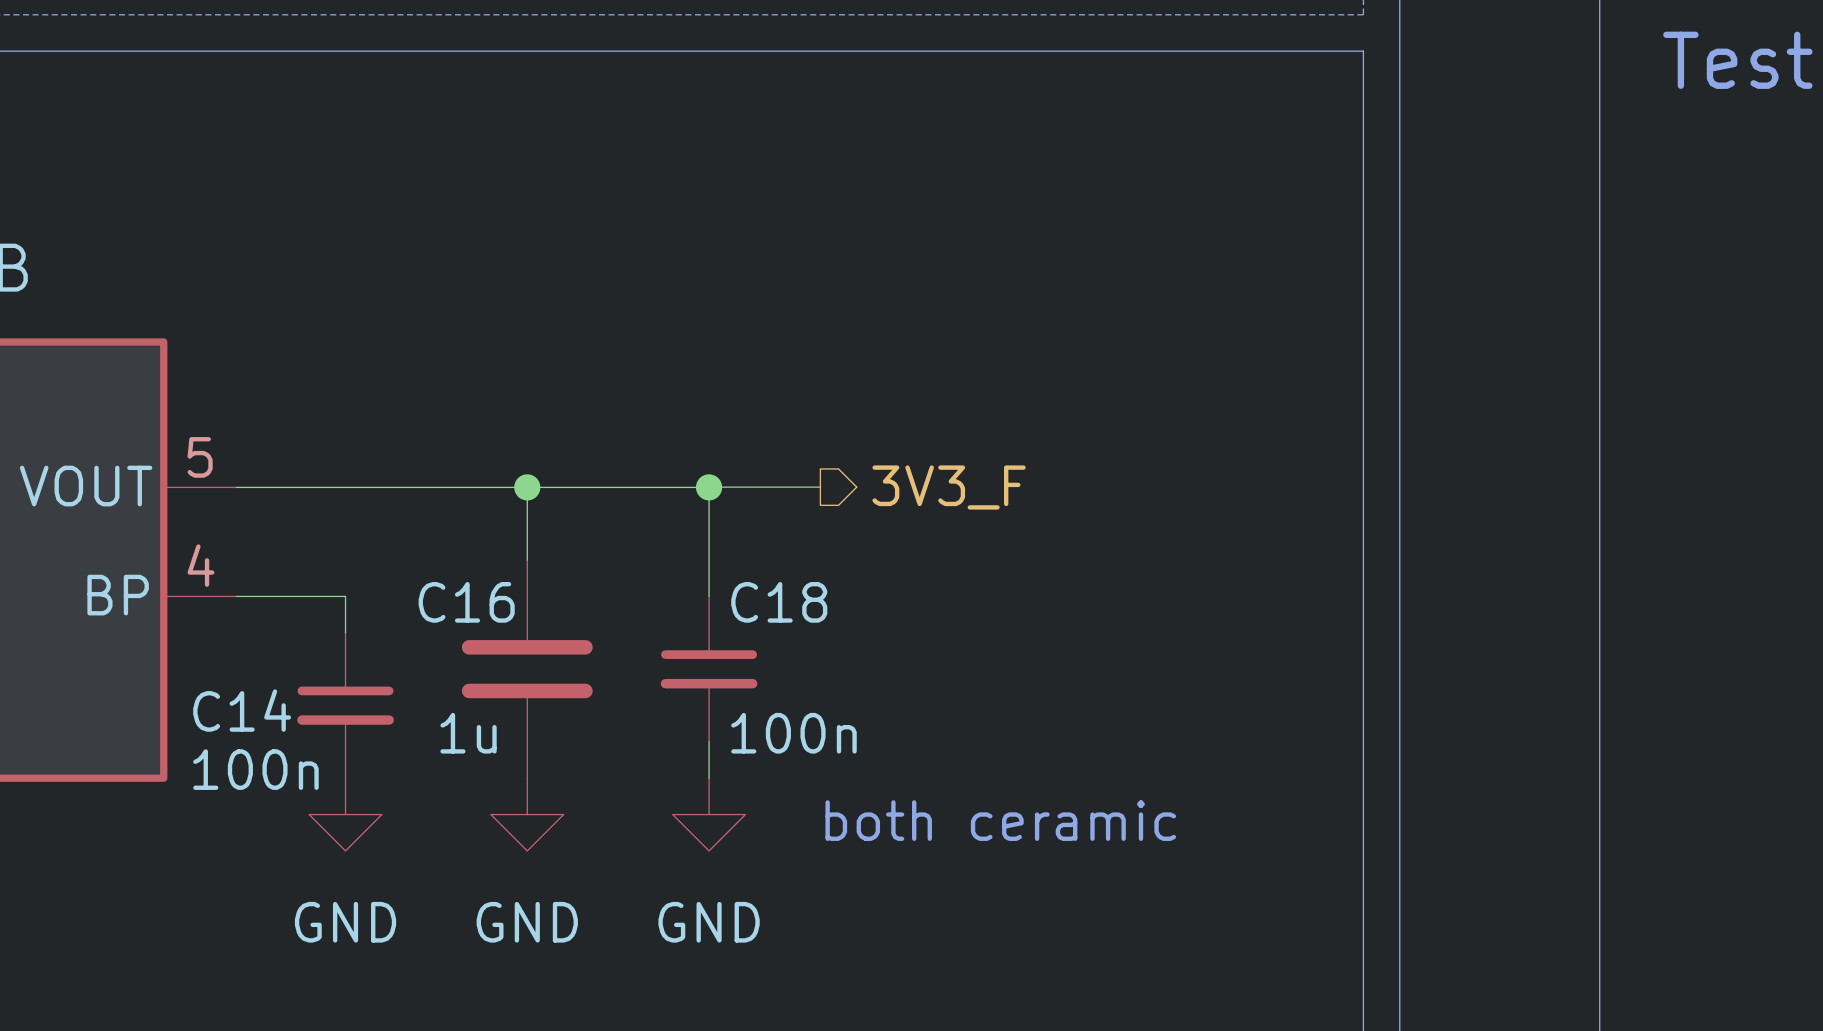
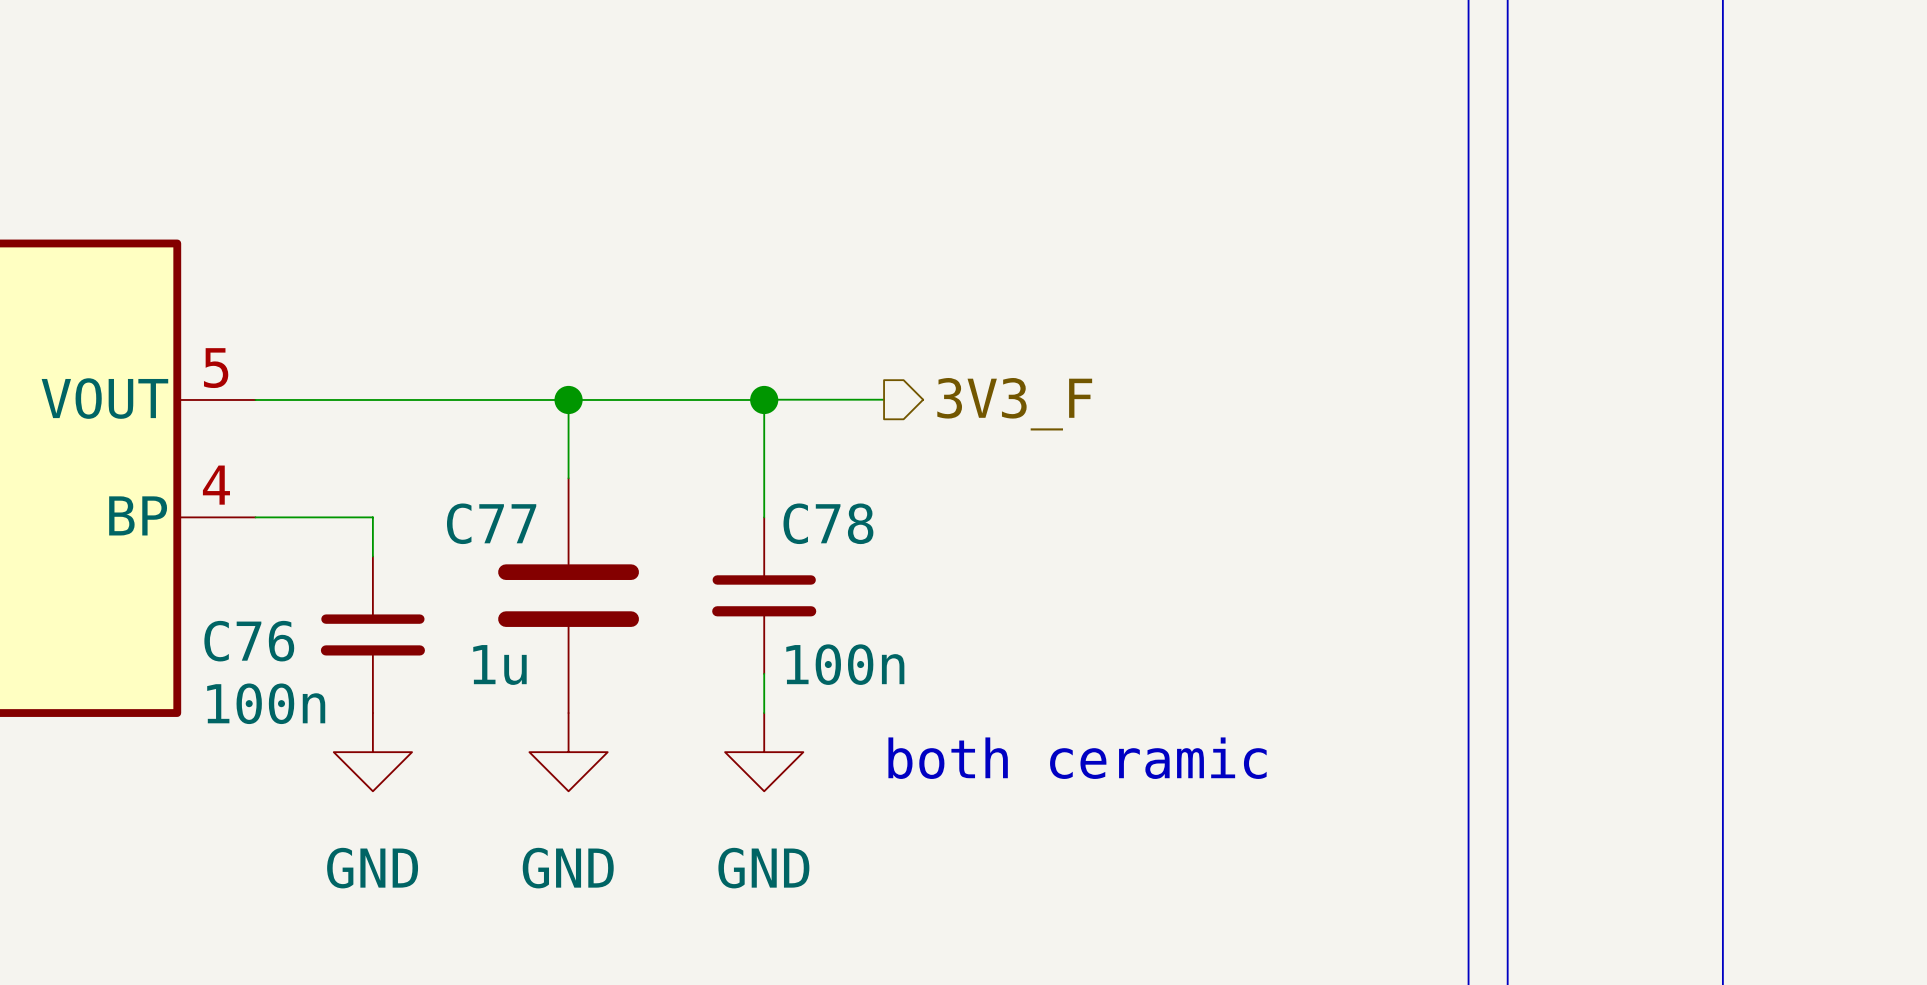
C16 name: C16 (466, 602) -> C77 (491, 523)
C18 name: C18 (779, 602) -> C78 (828, 523)
C14 name: C14 (242, 710) -> C76 (249, 641)

